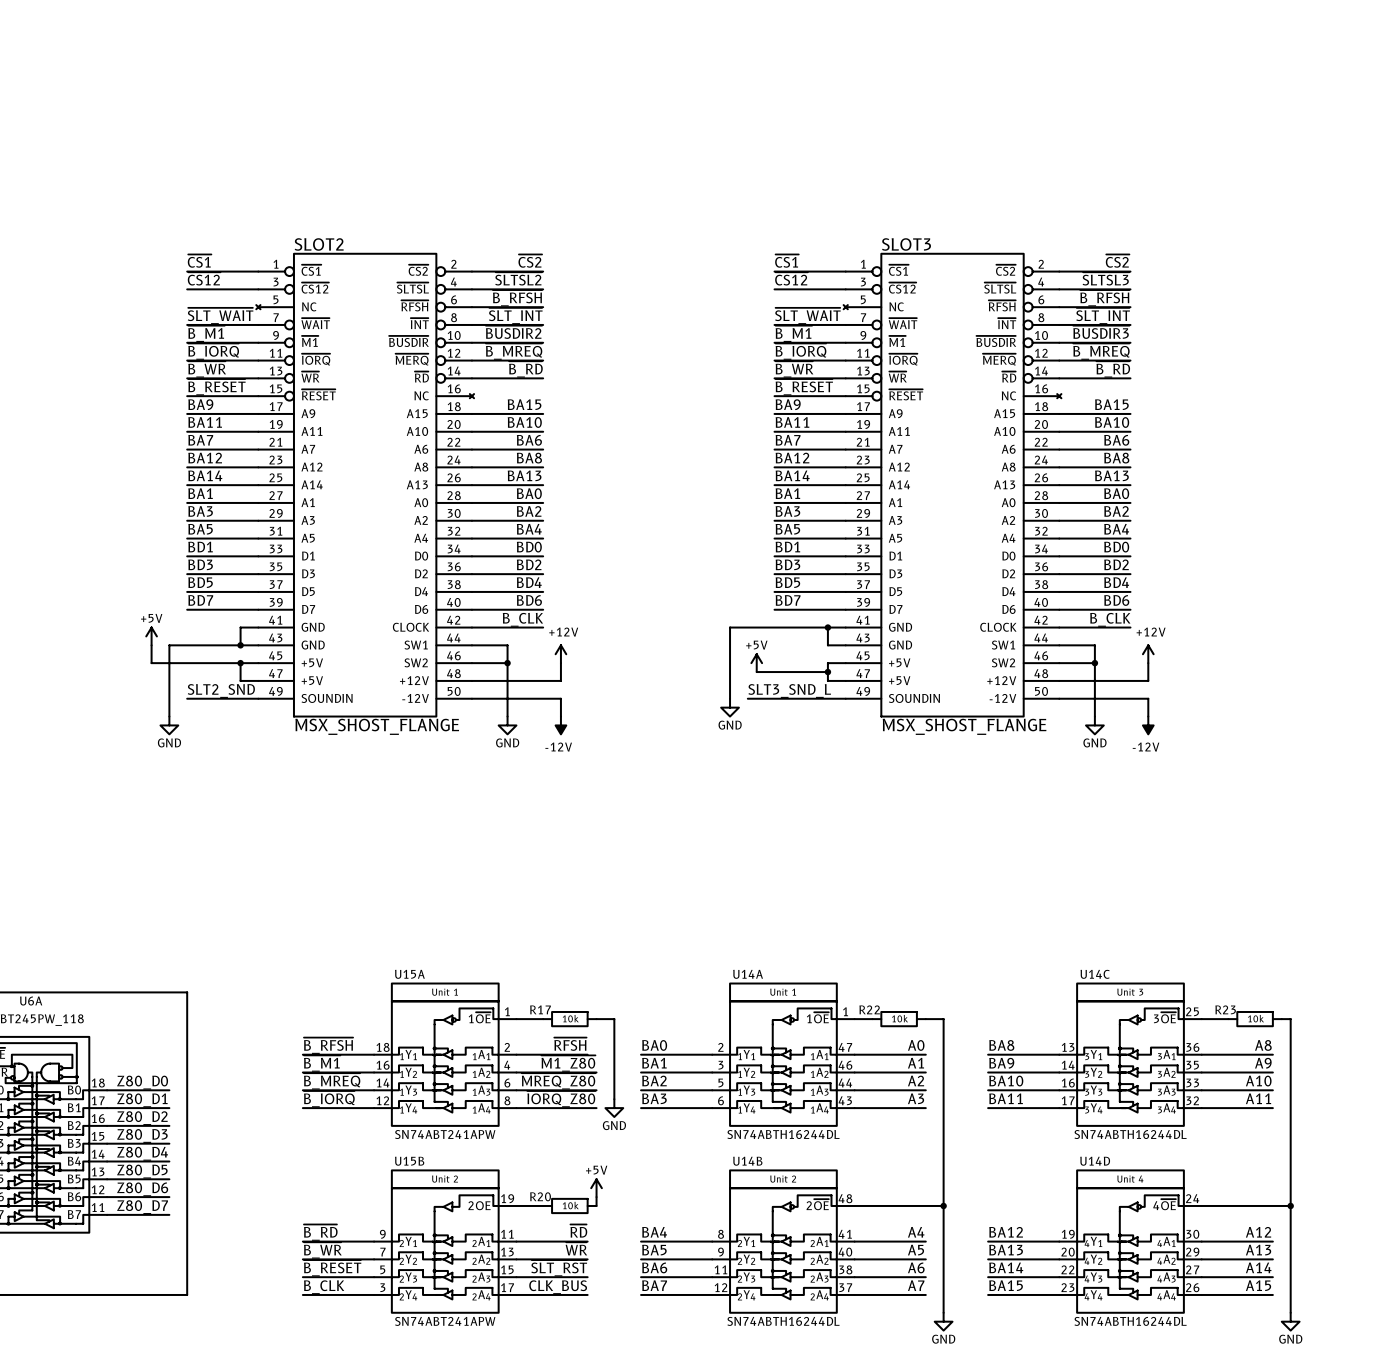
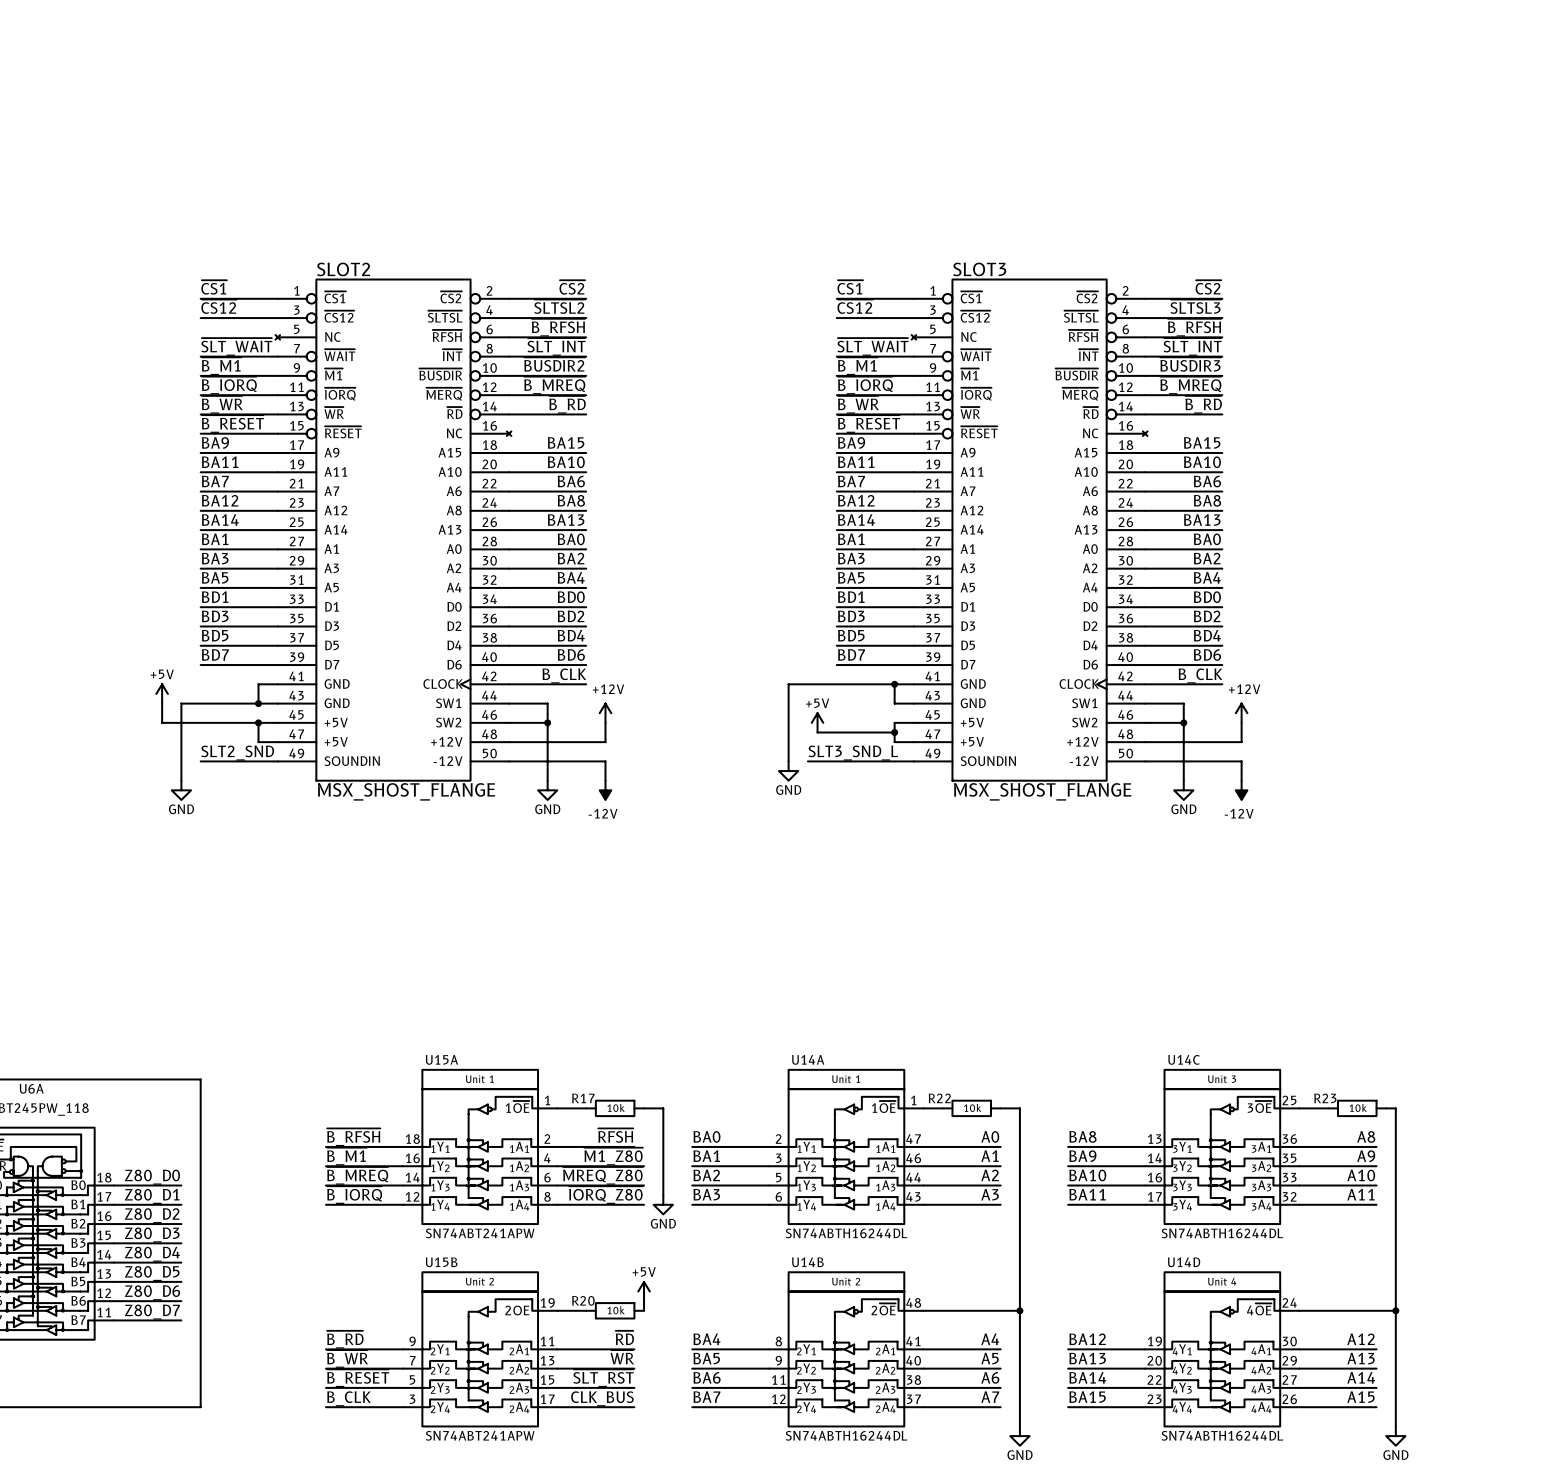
SLOT2 symbol: [256, 253, 475, 717] -> [275, 279, 512, 781]
SLOT3 symbol: [843, 253, 1062, 717] -> [911, 279, 1148, 781]

